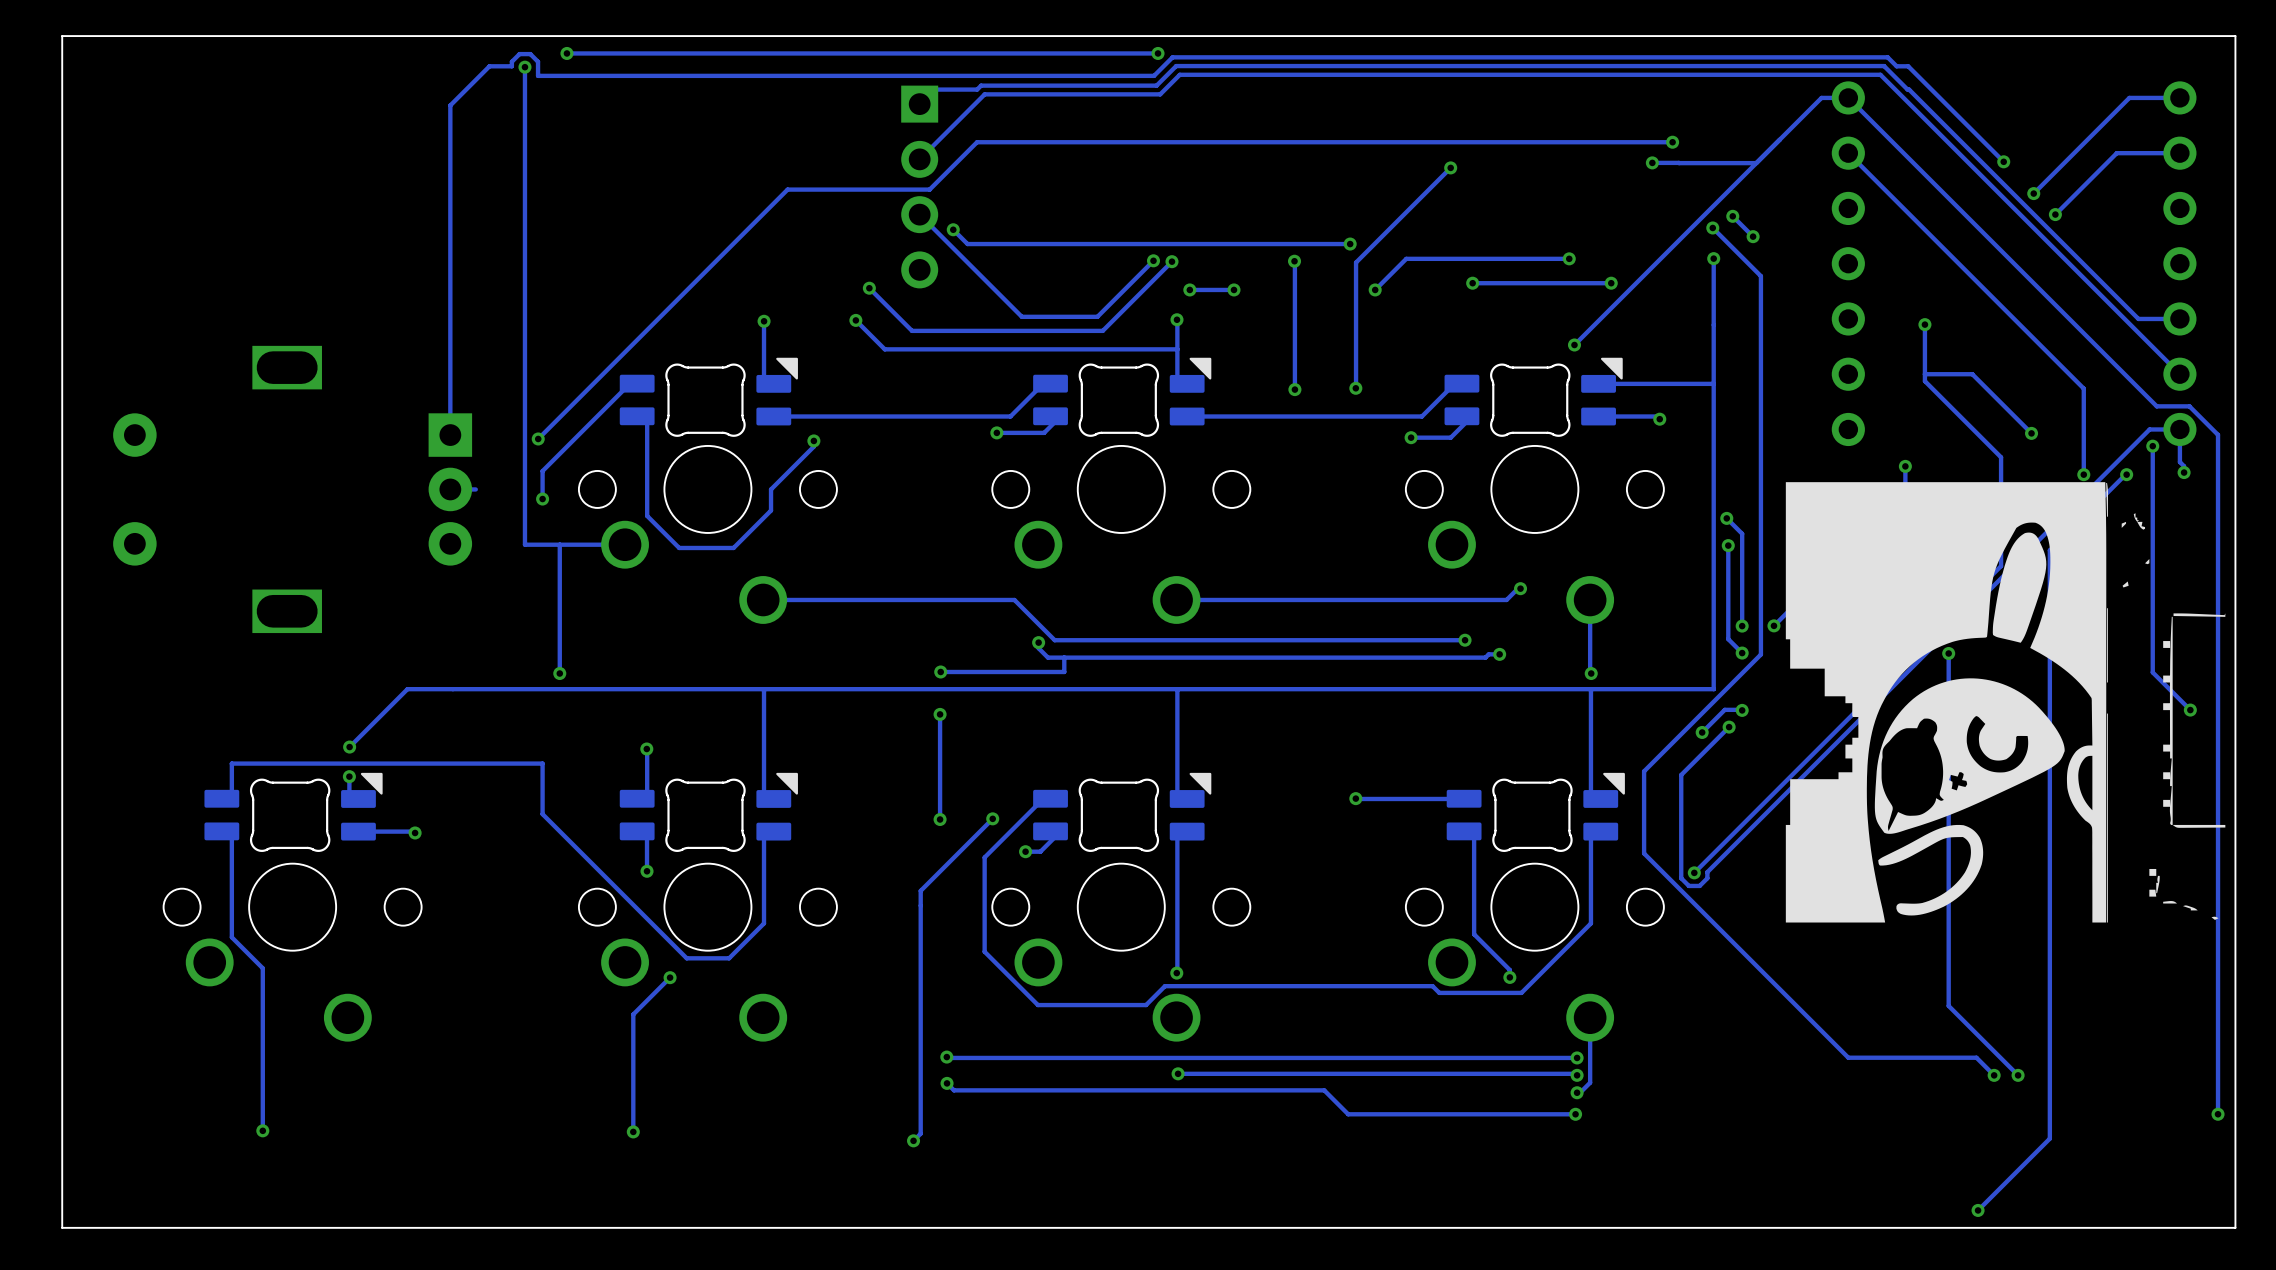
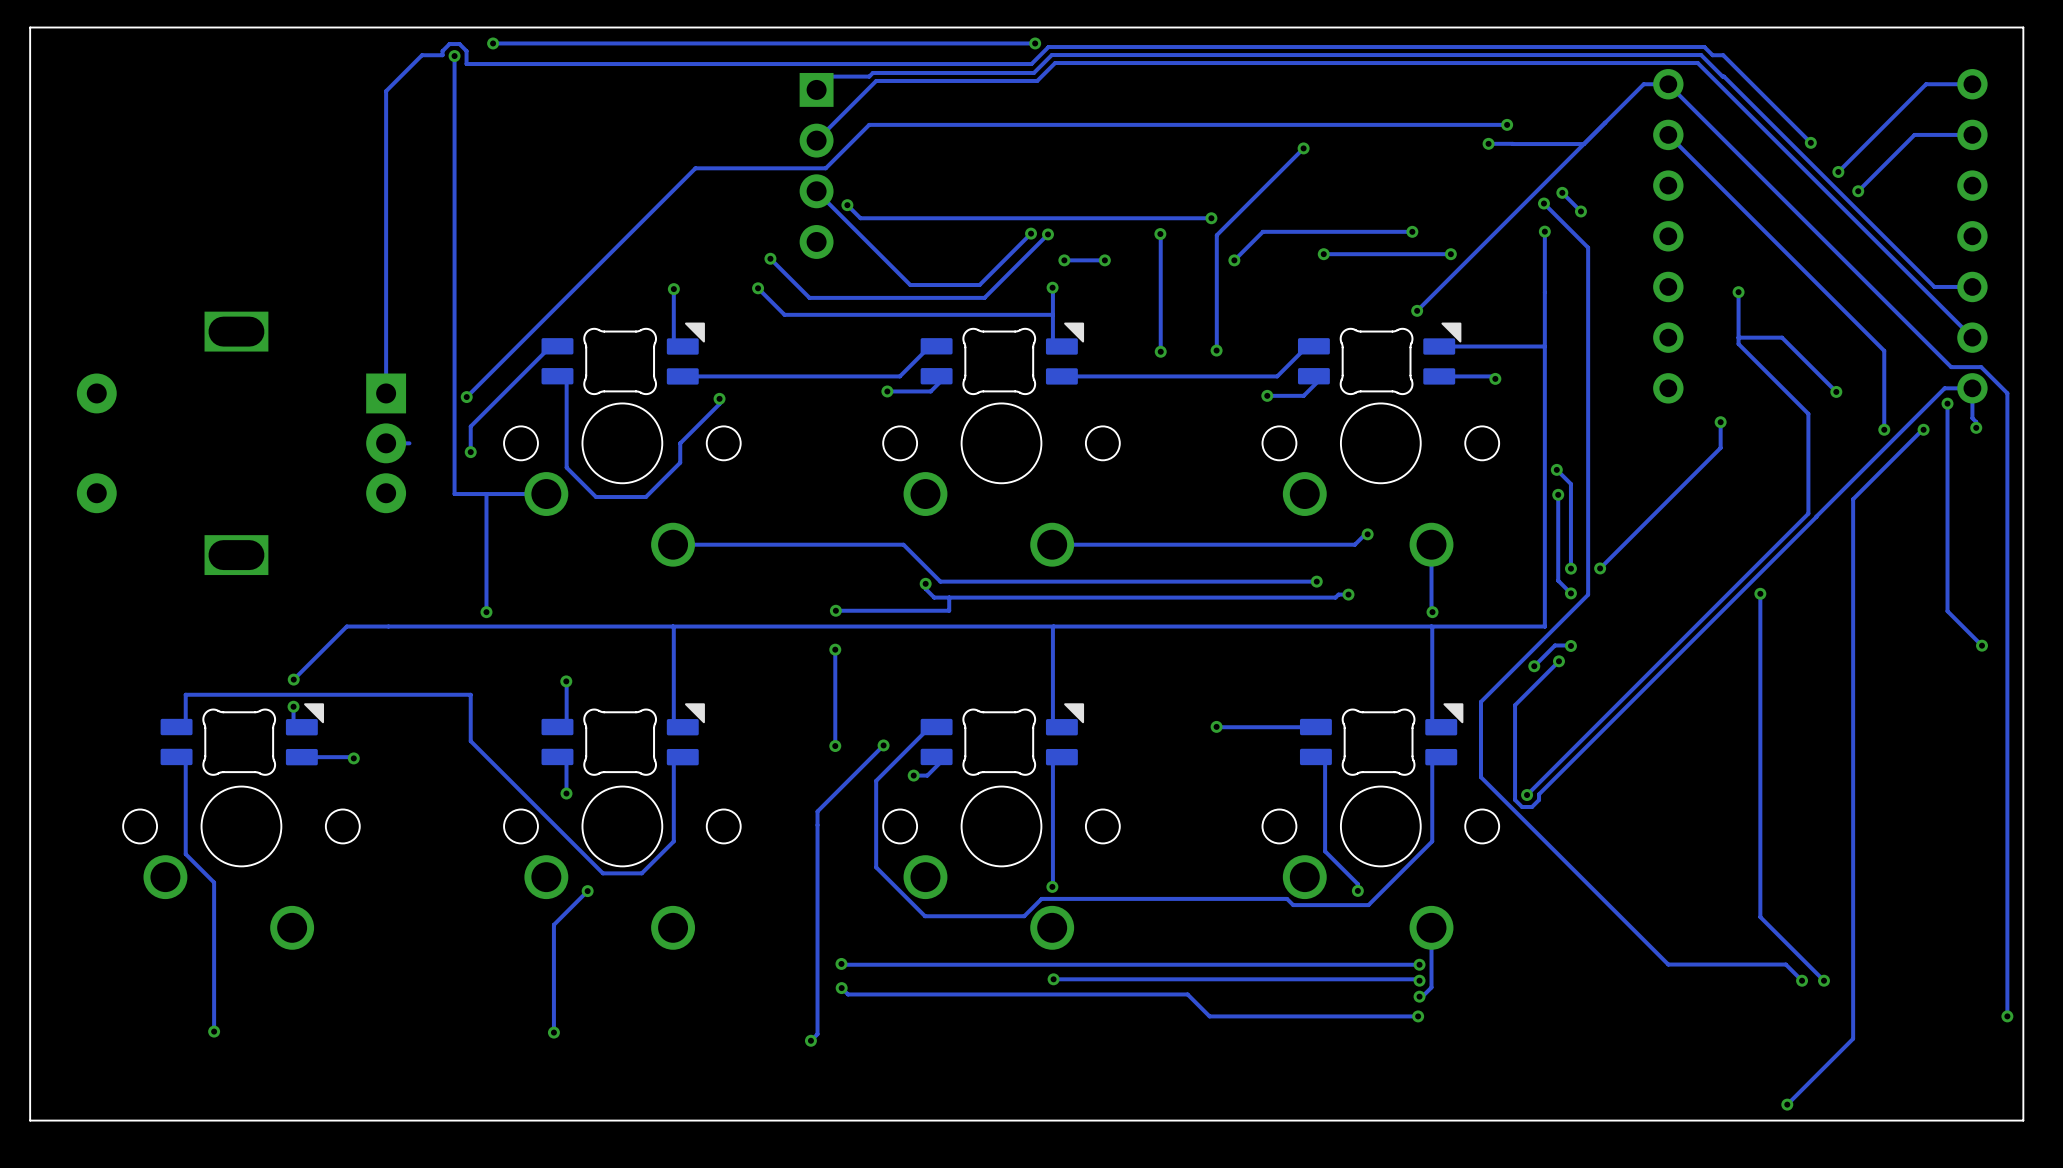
drawing: [1785, 482, 2150, 923] -> none
drawing: [2163, 613, 2226, 828] -> none
drawing: [2149, 868, 2219, 920] -> none

